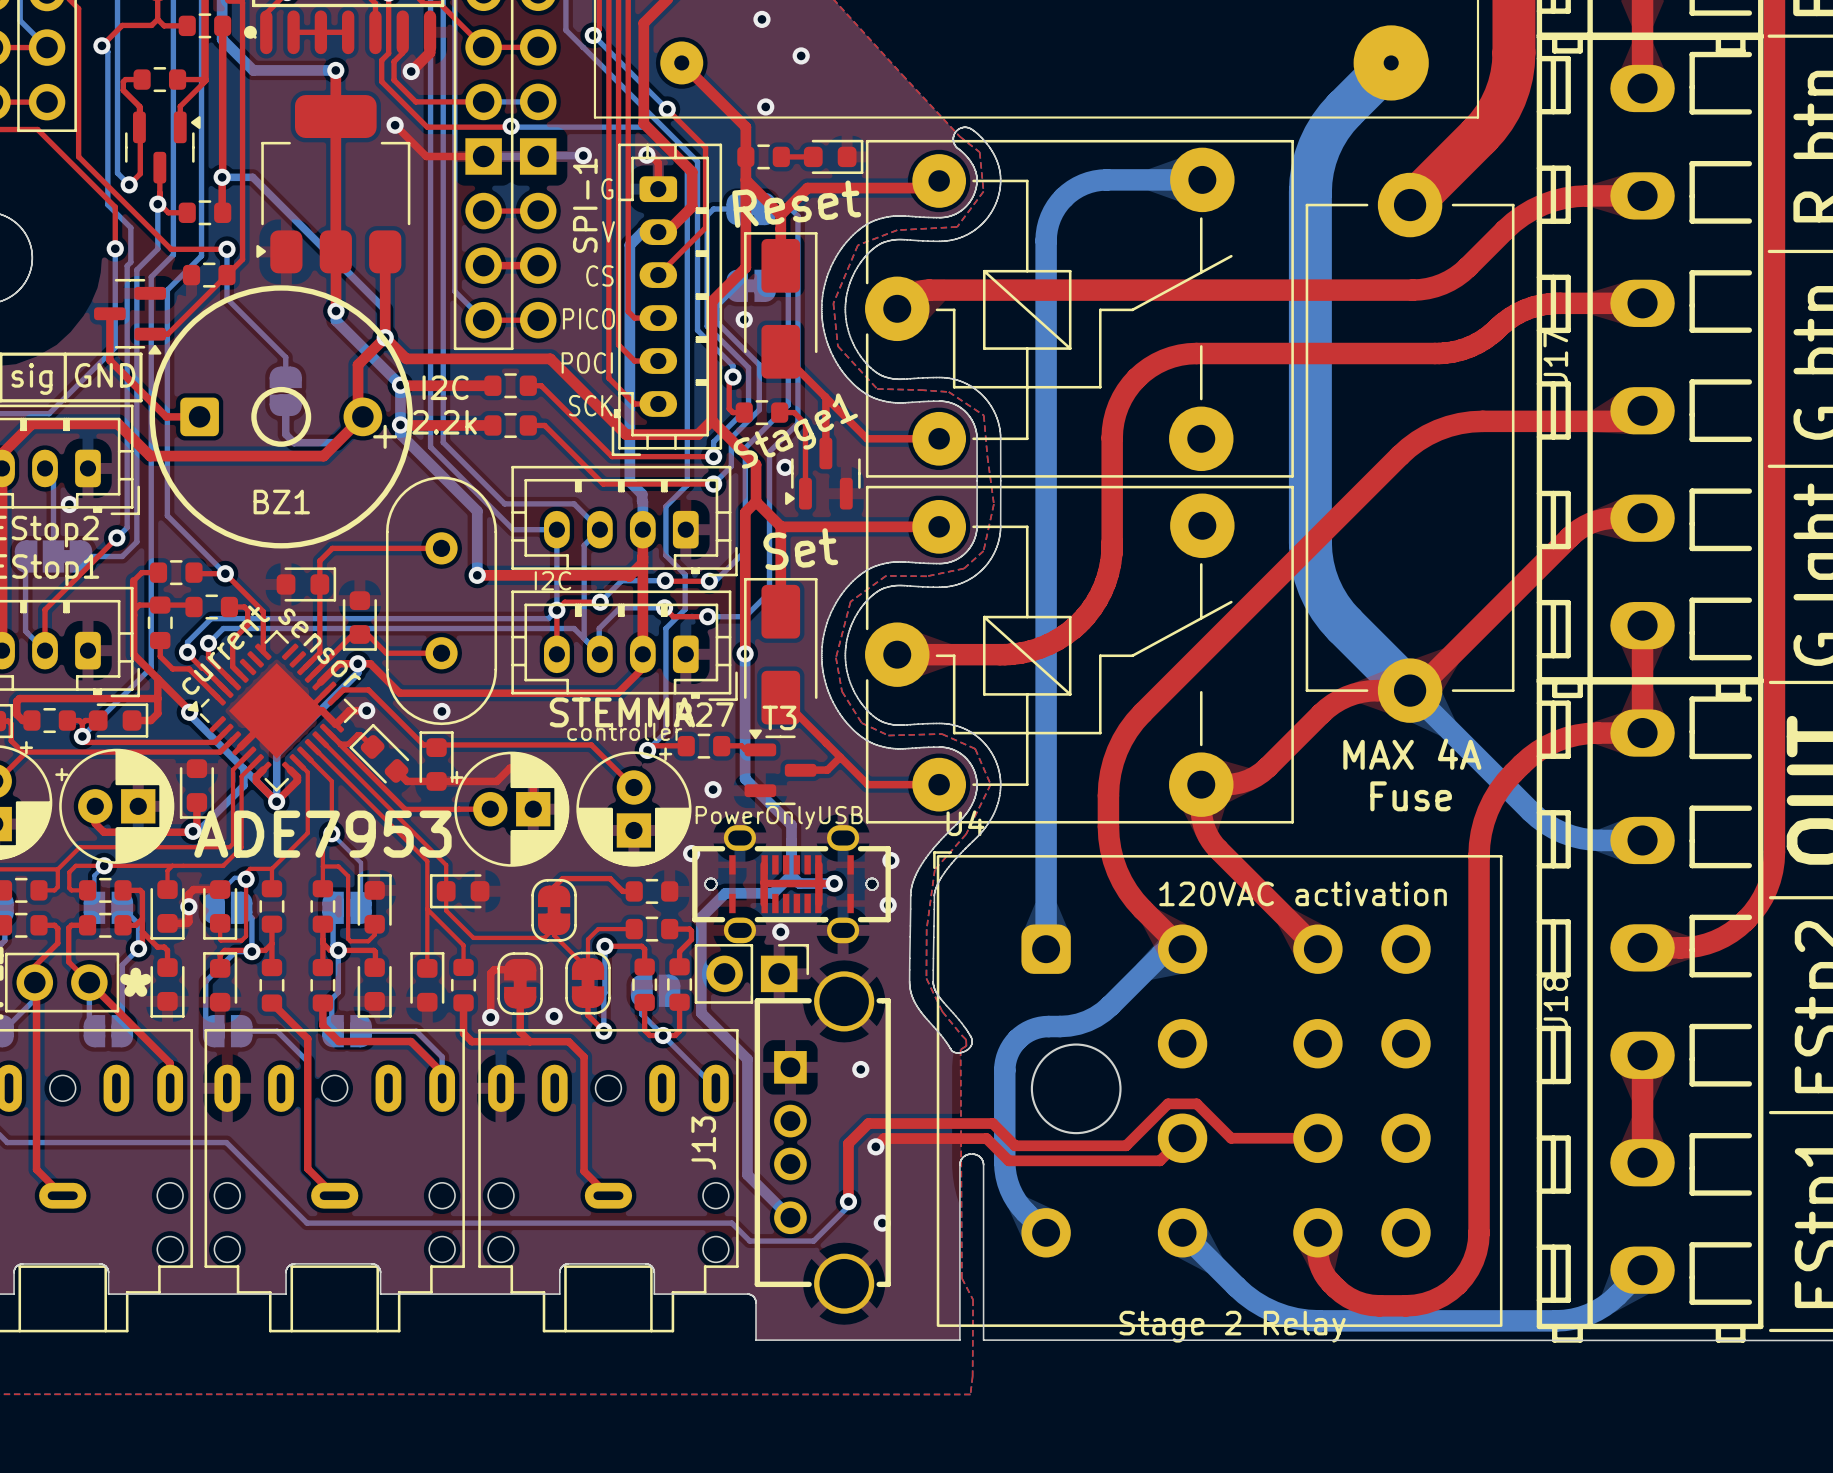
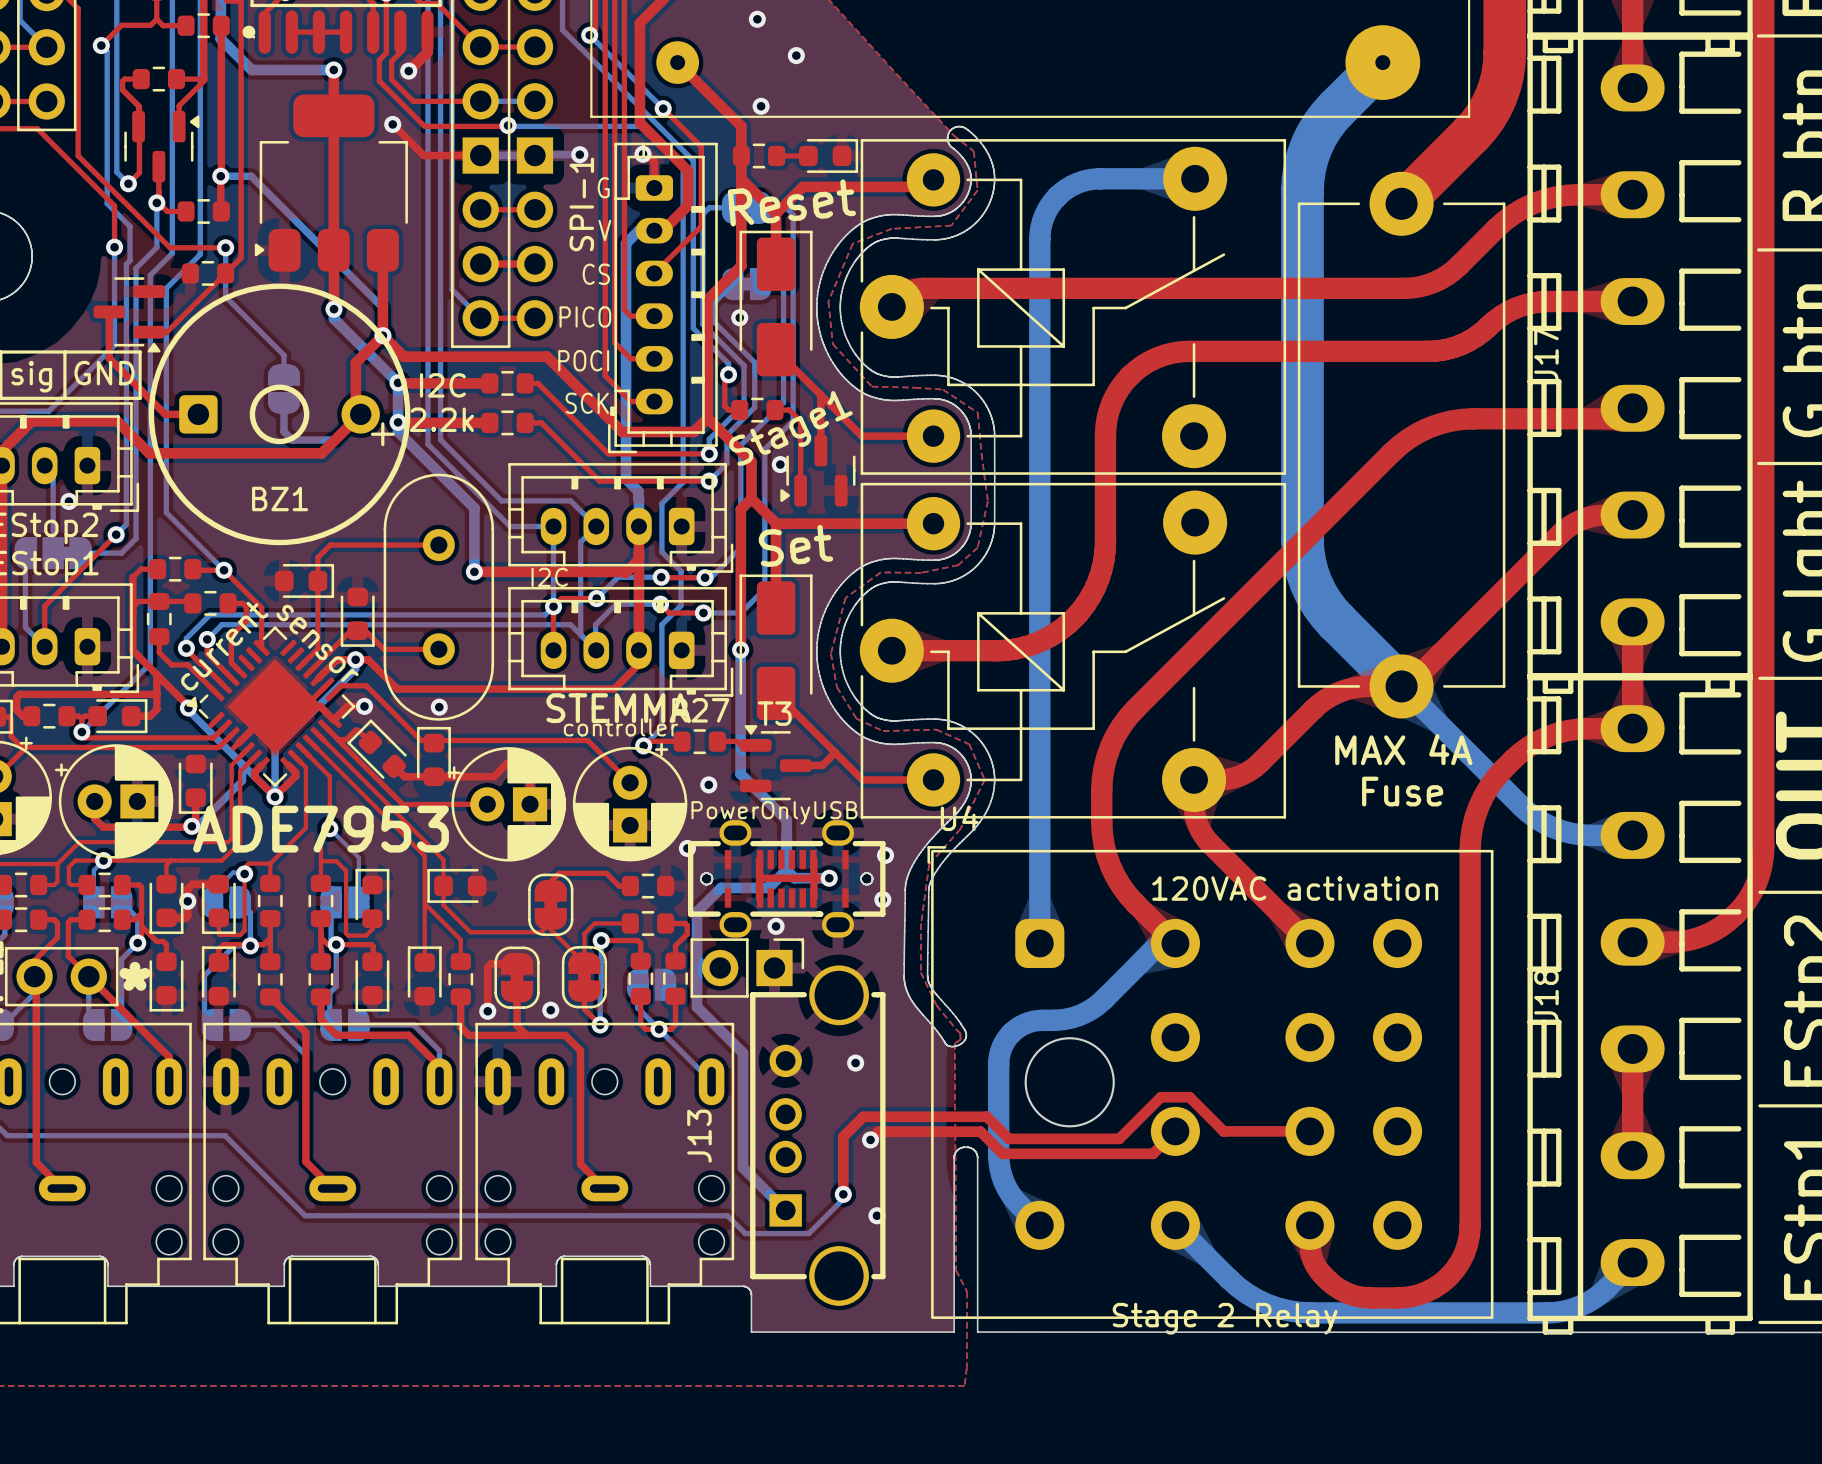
J13 footprint: [754, 971, 891, 1314] -> [750, 965, 886, 1306]

